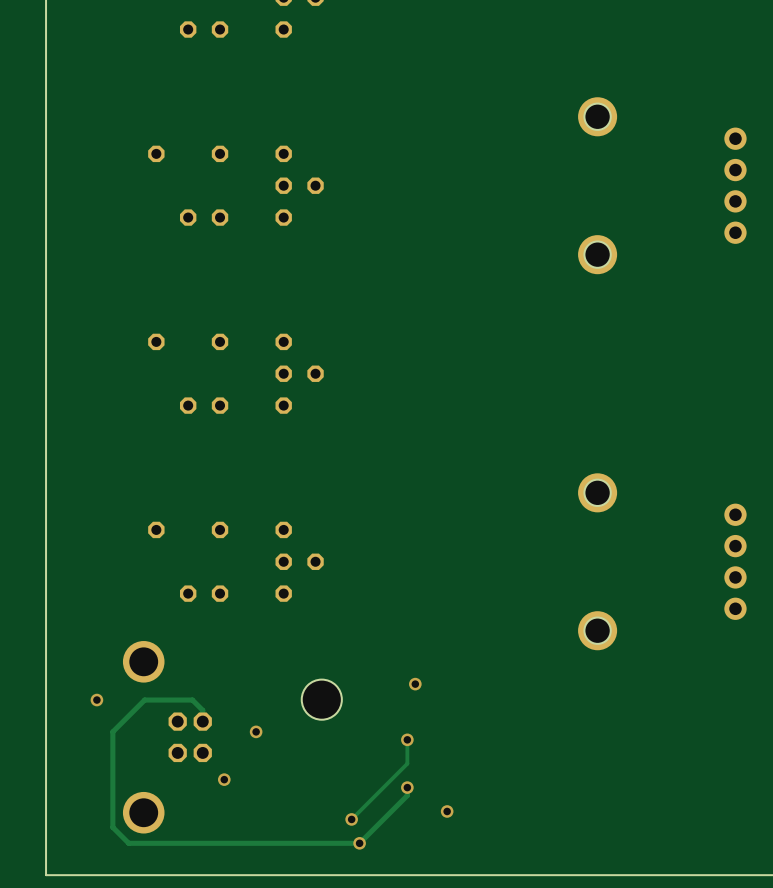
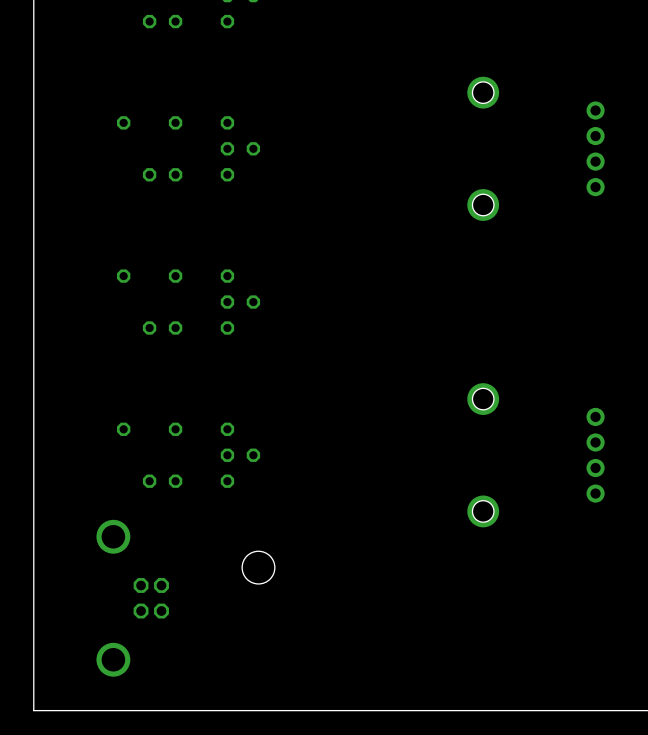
via: (415, 684) -> none
via: (96, 700) -> none
track: (202, 721) (202, 710) (192, 700) (144, 700) (112, 731) (112, 827) (128, 843) (359, 843) (407, 795) (407, 787) -> none
via: (256, 731) -> none
track: (407, 739) (407, 763) (351, 819) -> none
via: (407, 739) -> none
via: (224, 779) -> none
via: (407, 787) -> none
via: (447, 811) -> none
via: (351, 819) -> none
via: (359, 843) -> none

